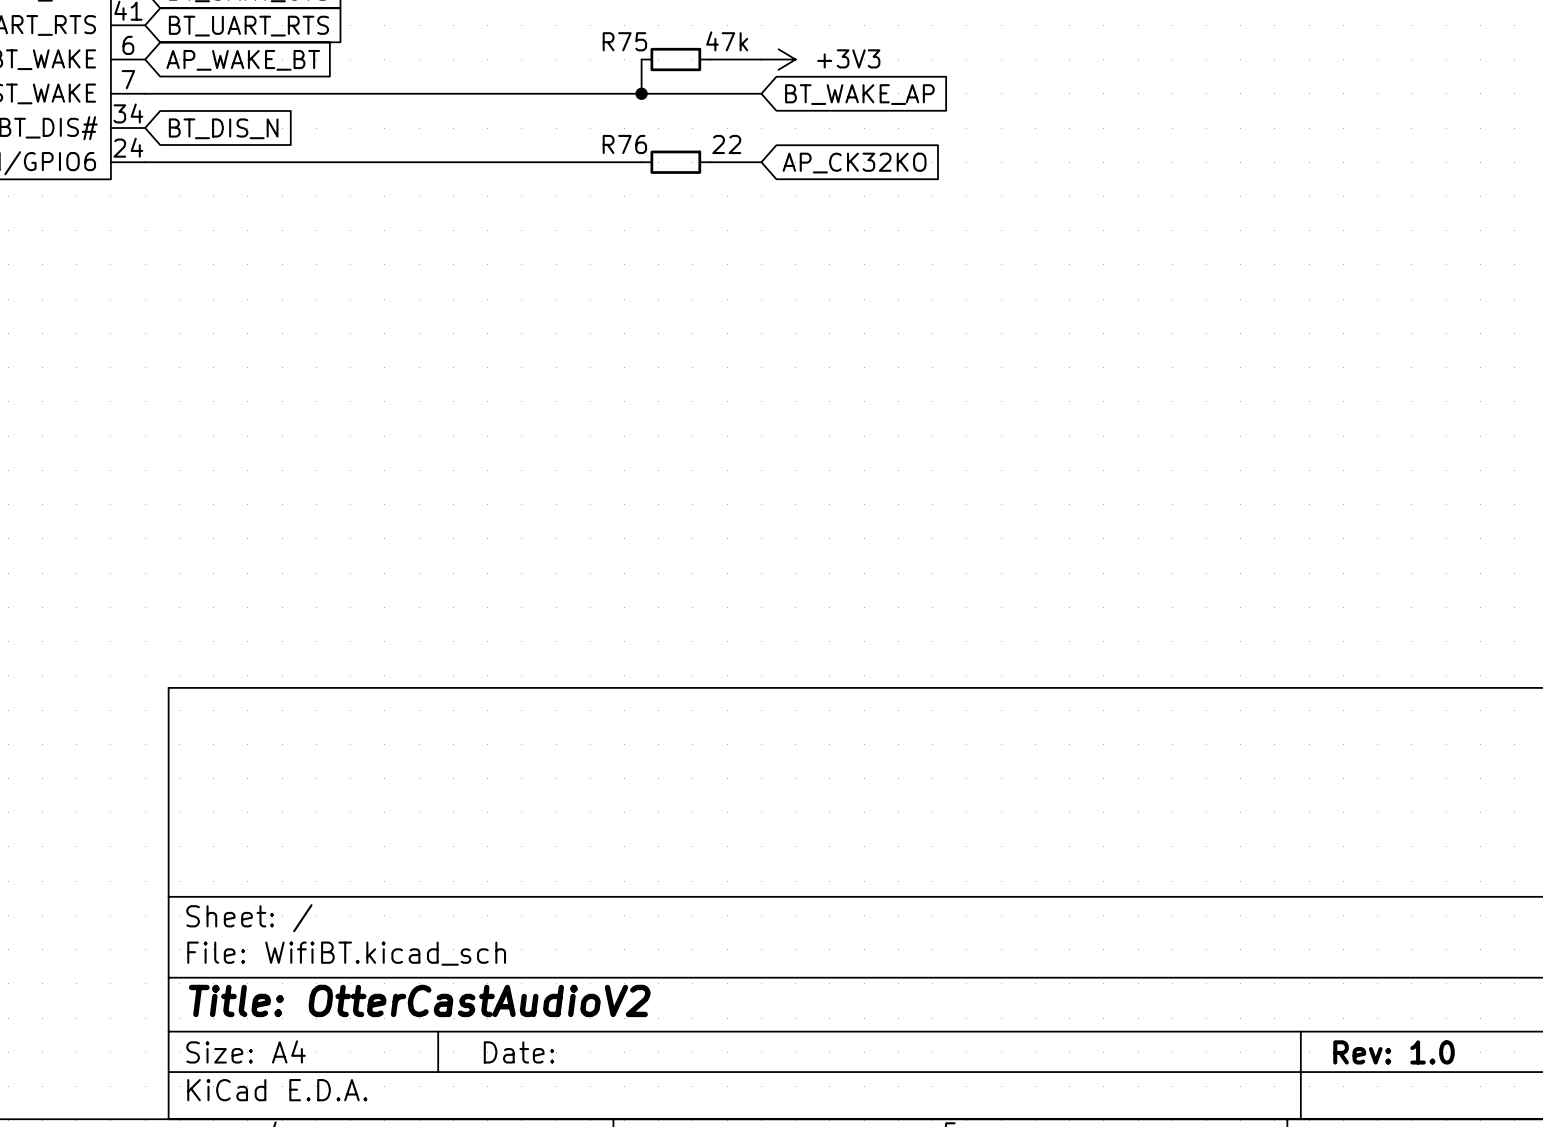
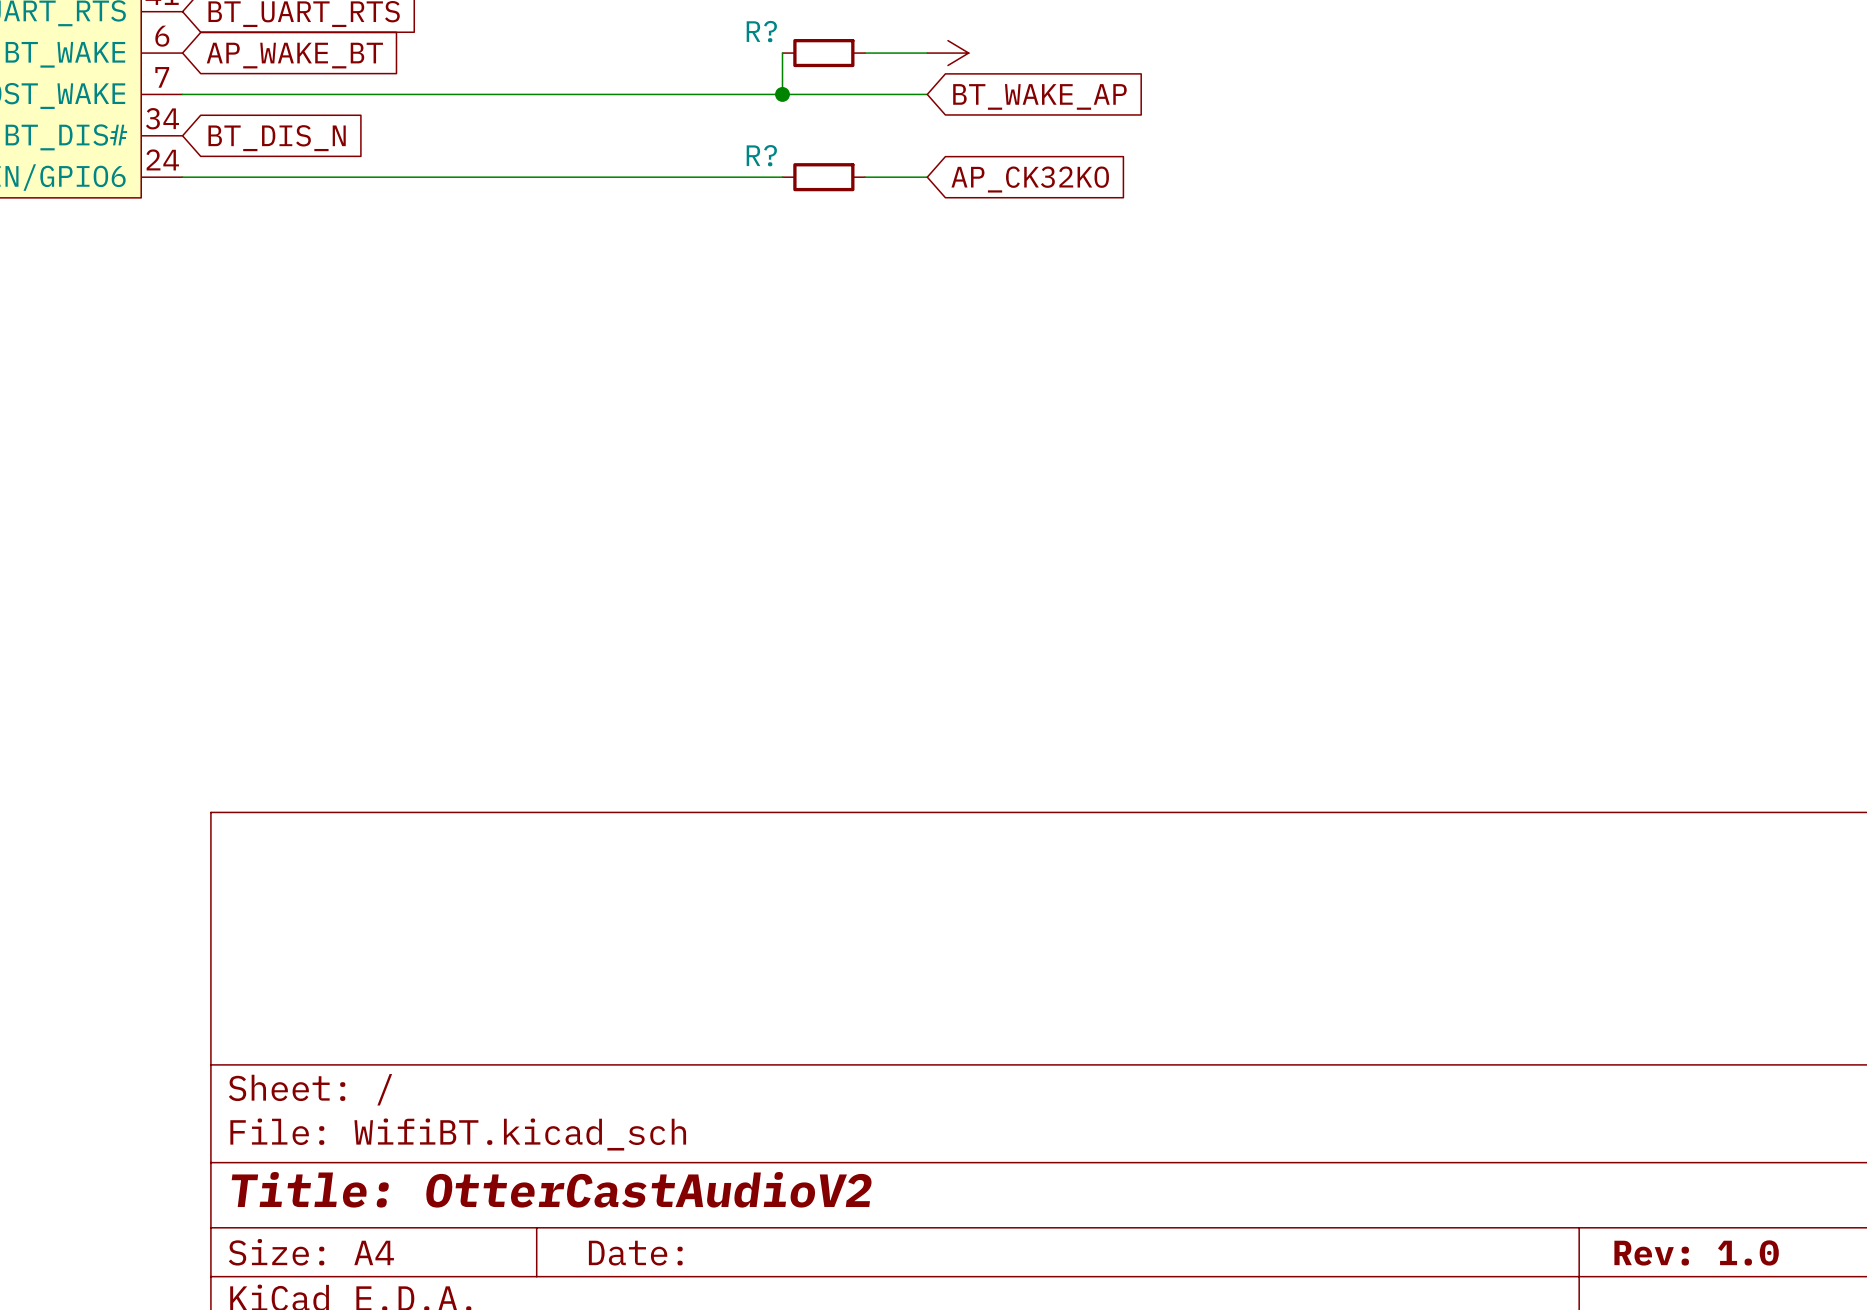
R75 name: R75 (624, 41) -> R? (761, 31)
R75 value: 47k (727, 41) -> none
power symbol text: +3V3 (848, 58) -> none
R76 name: R76 (624, 144) -> R? (761, 155)
R76 value: 22 (726, 144) -> none

